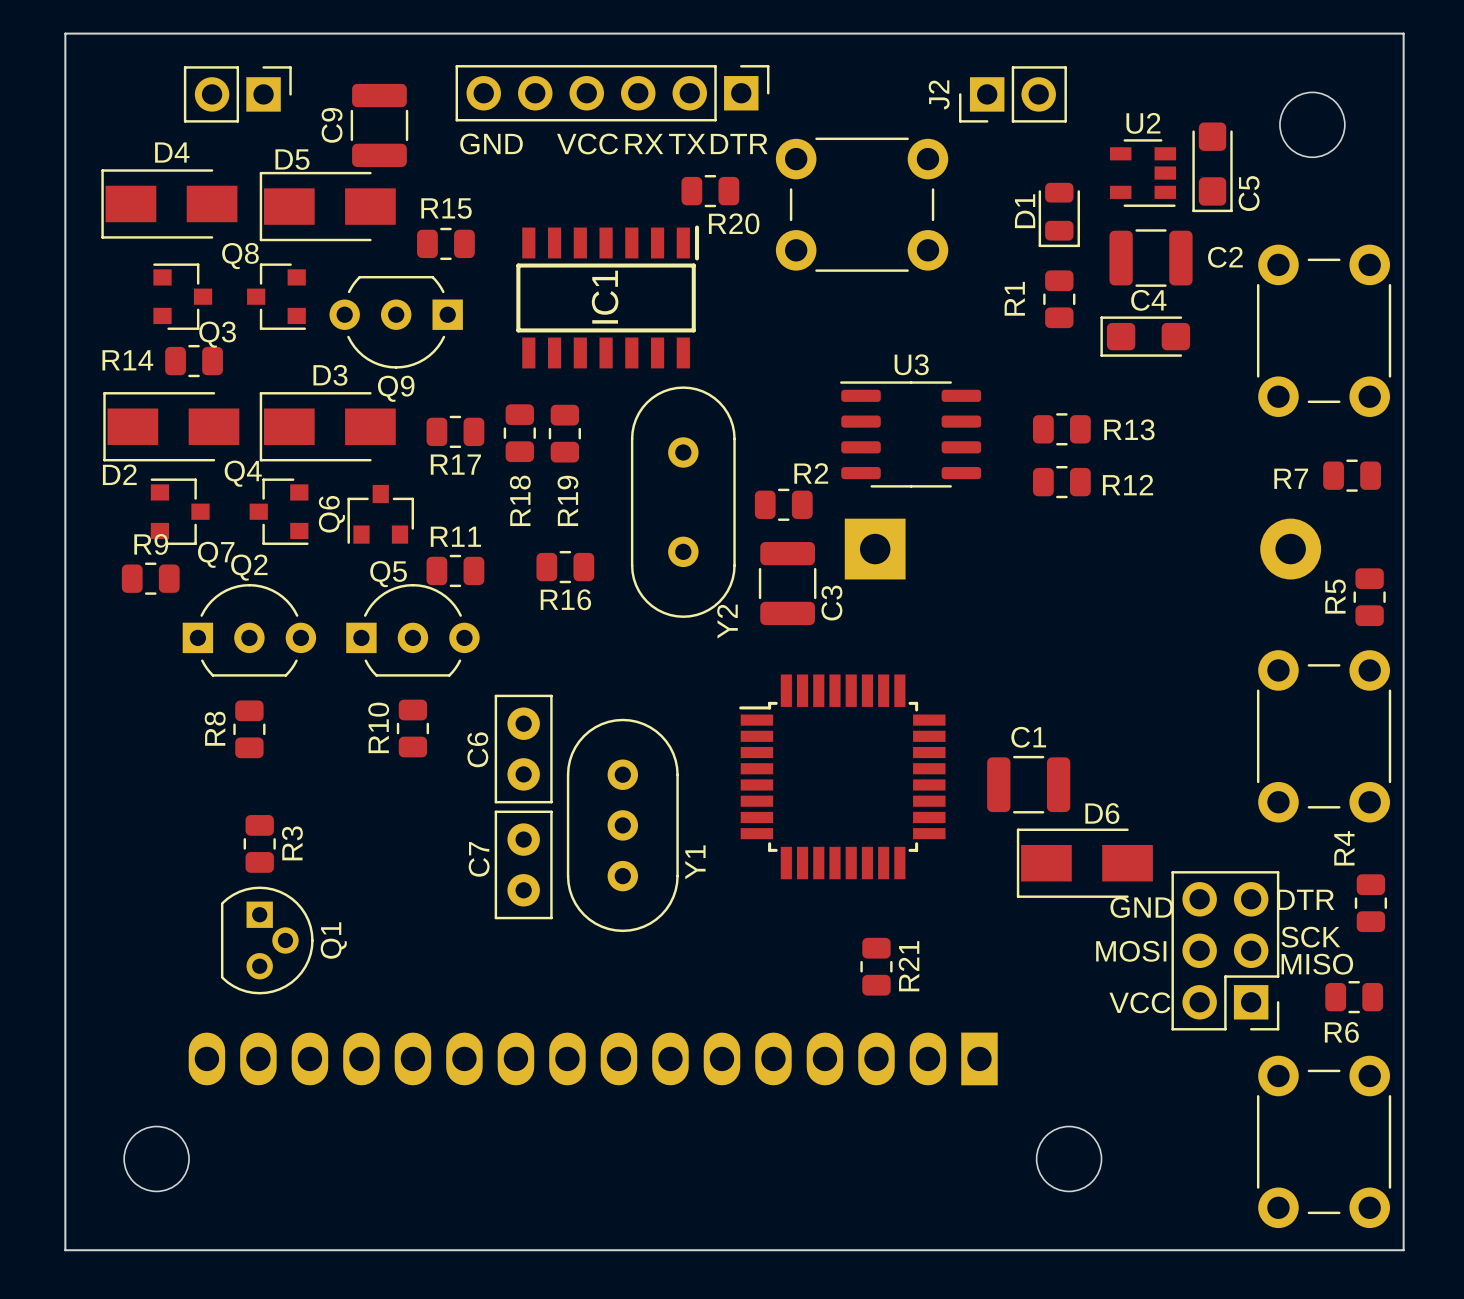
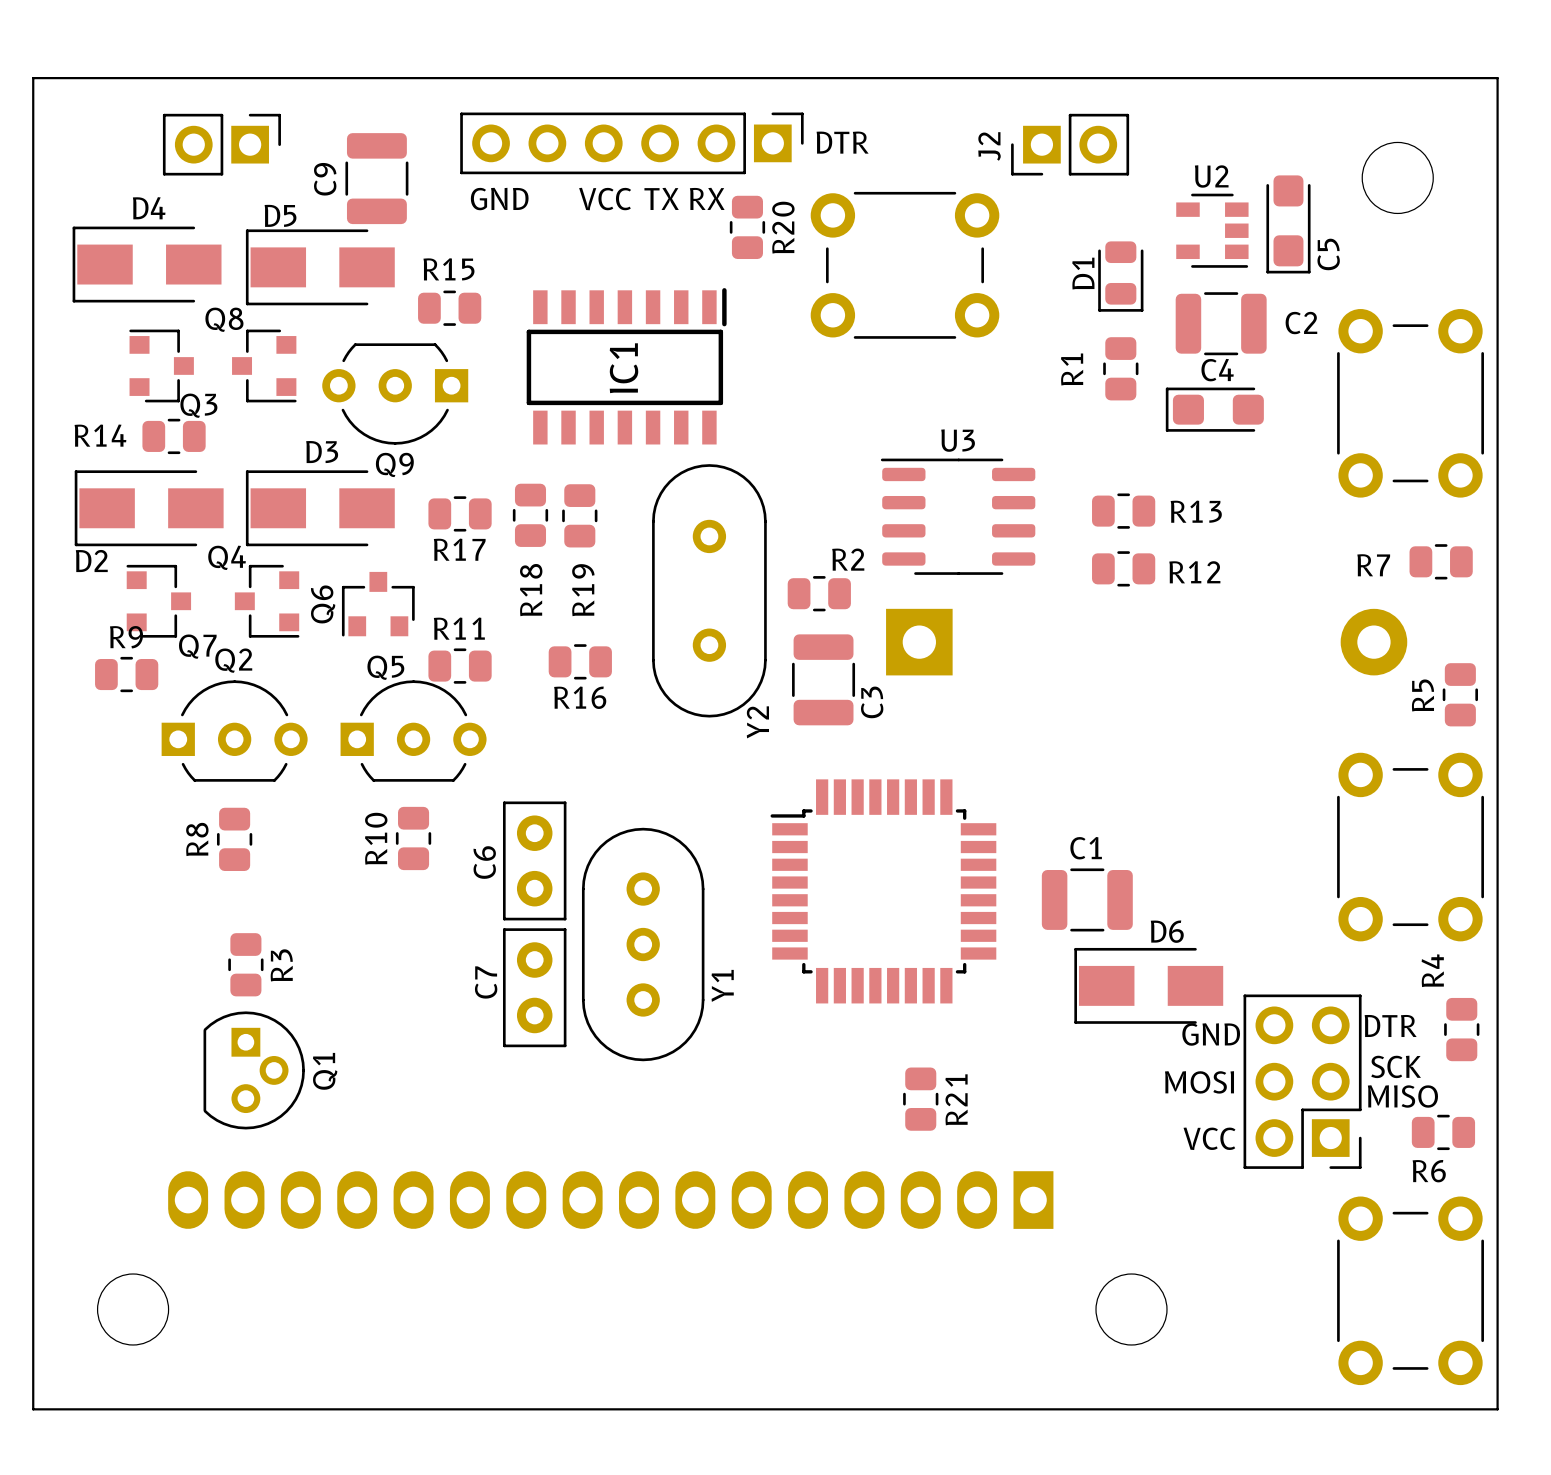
text: RX (644, 143) -> TX (661, 198)
text: TX (687, 143) -> RX (707, 198)
text position: DTR (739, 143) -> DTR (842, 142)
R20 rotation: 0° (710, 191) -> 90° clockwise (747, 227)

